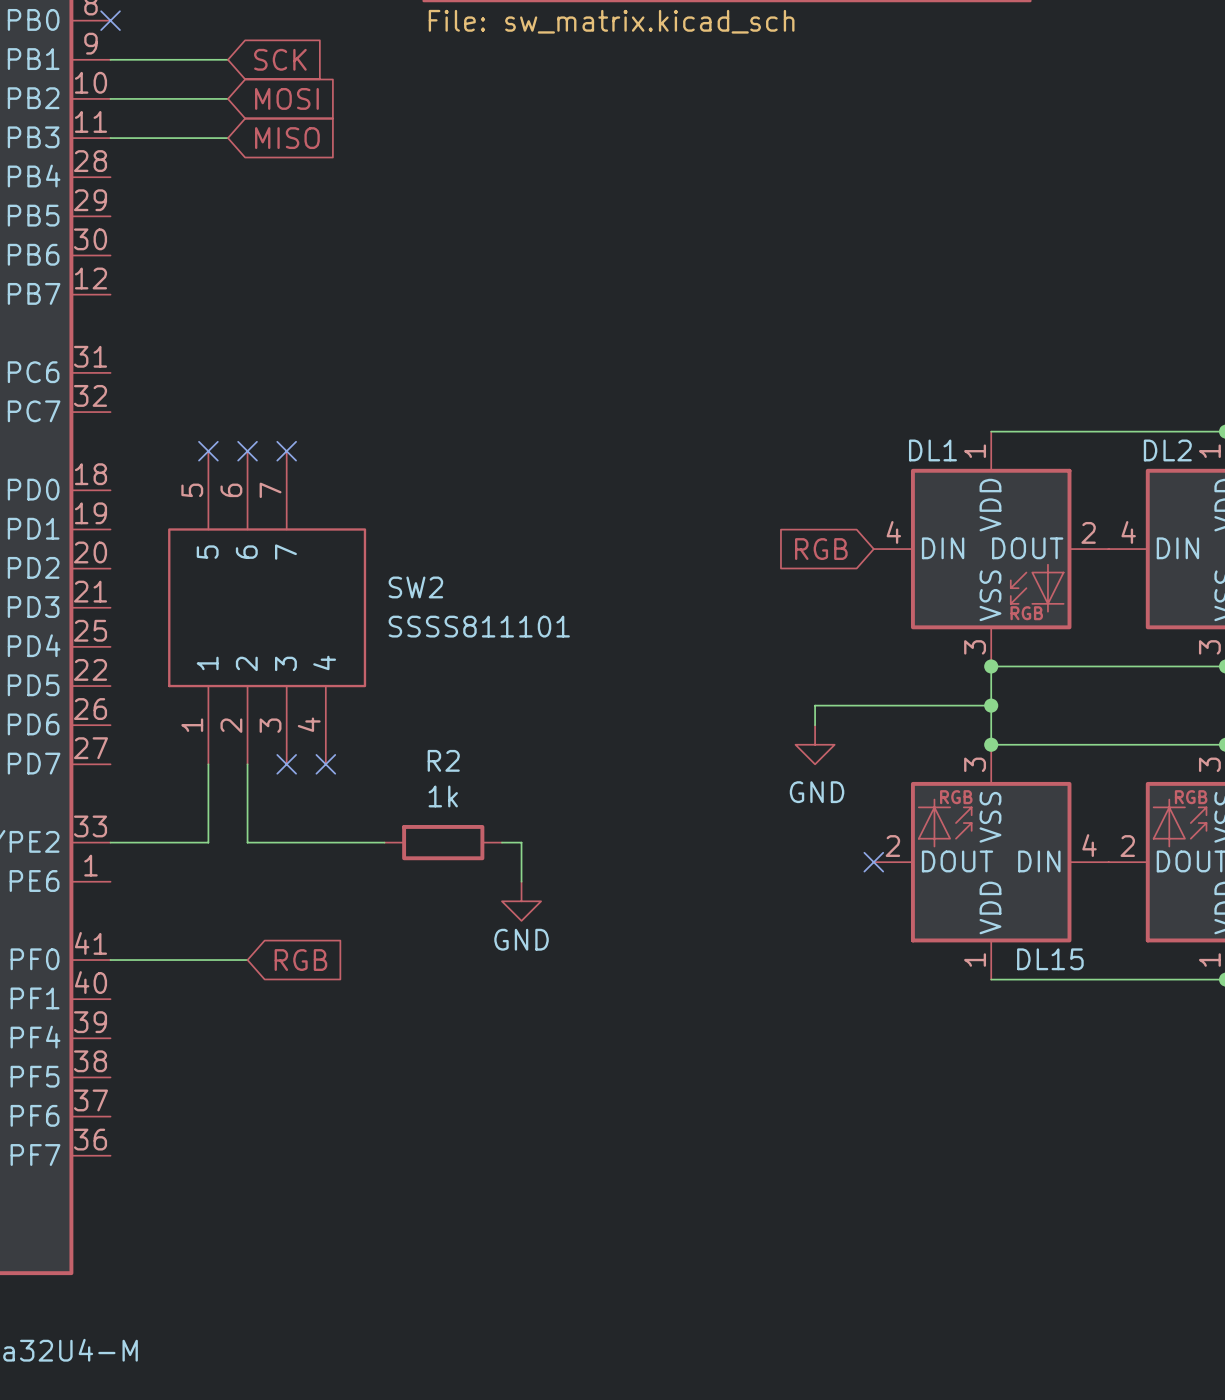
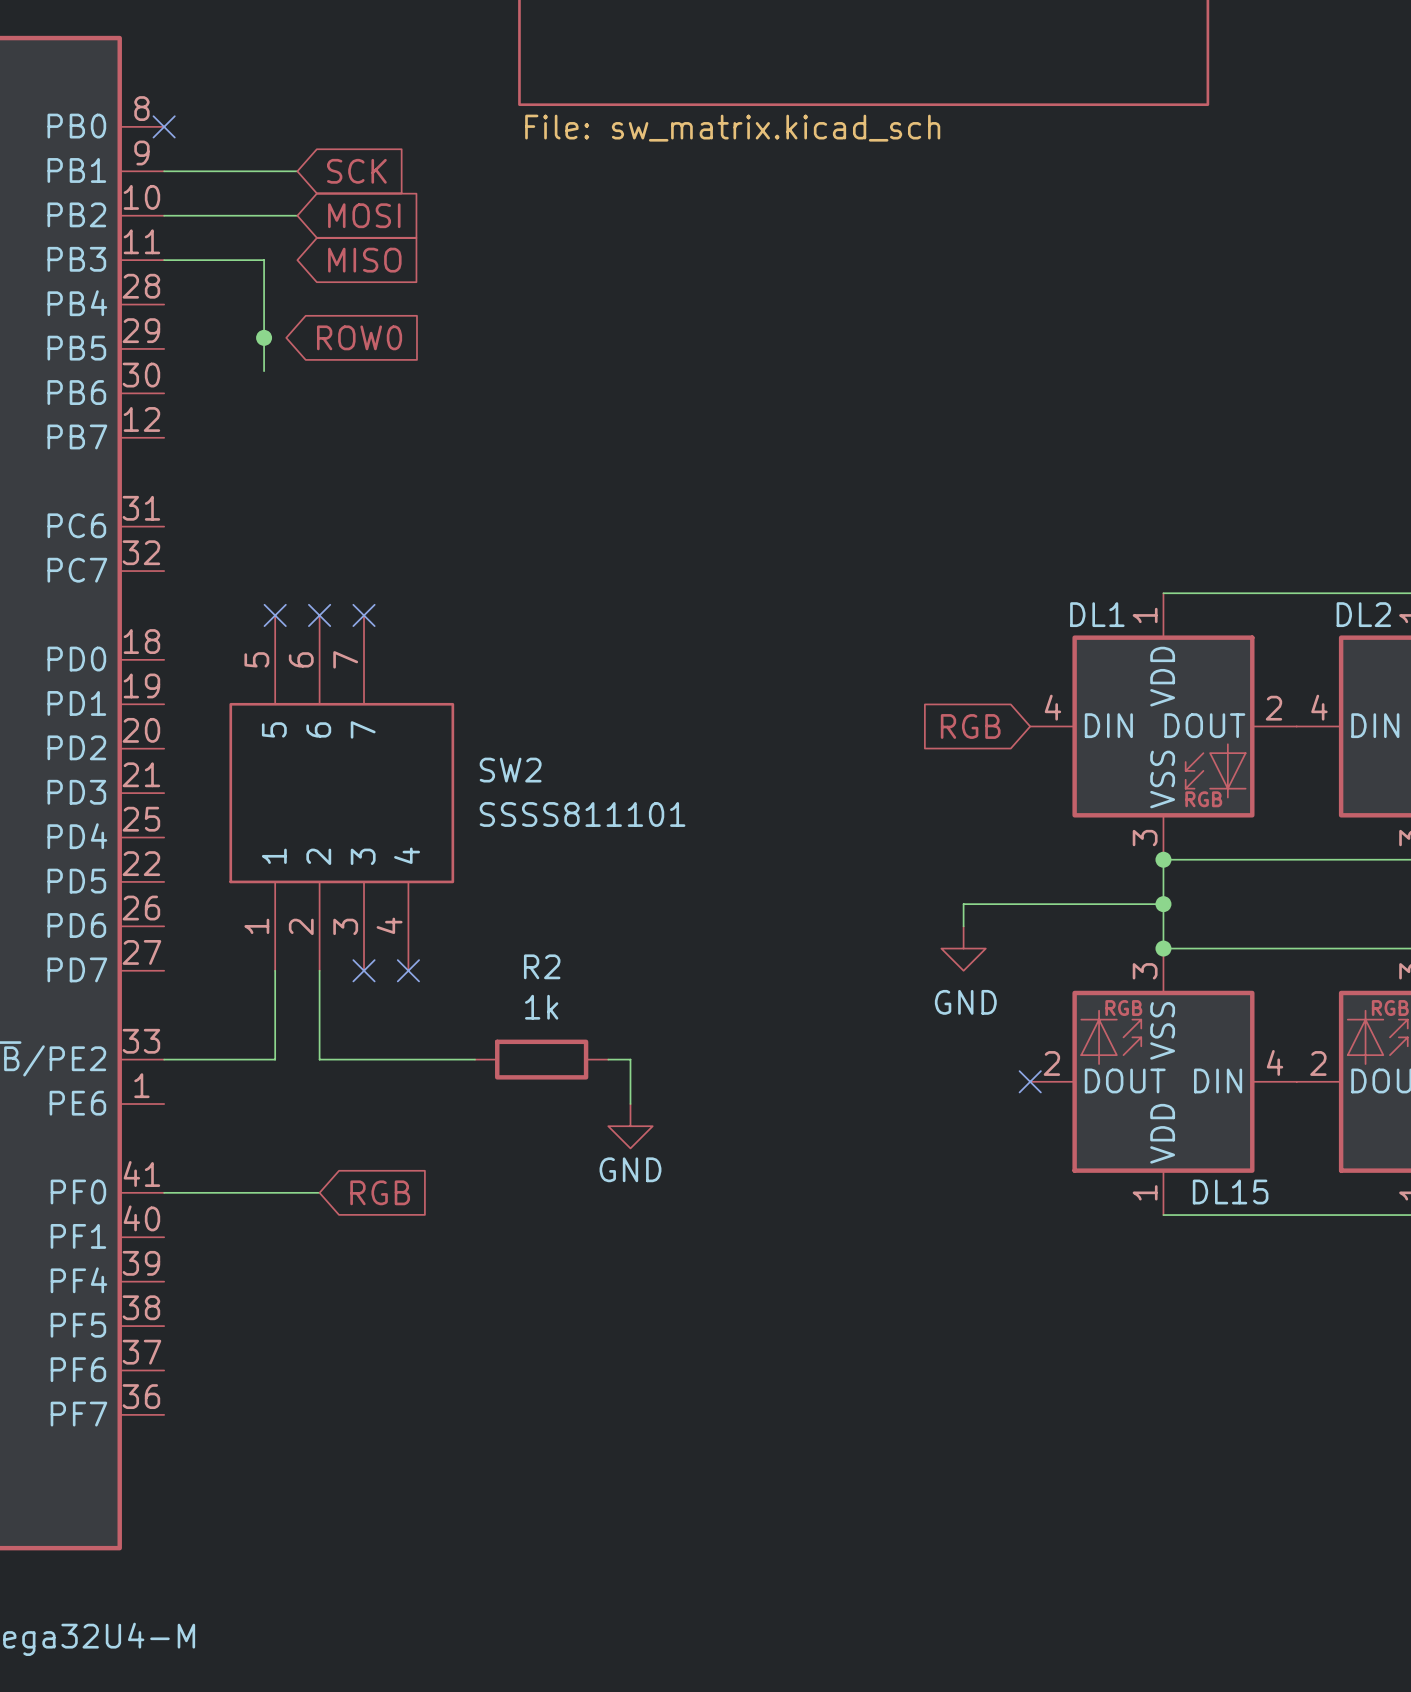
wire: (198, 138) (227, 138) -> (264, 260) (264, 371)
junction: none -> (264, 337)
global label: none -> ROW0 (359, 337)

